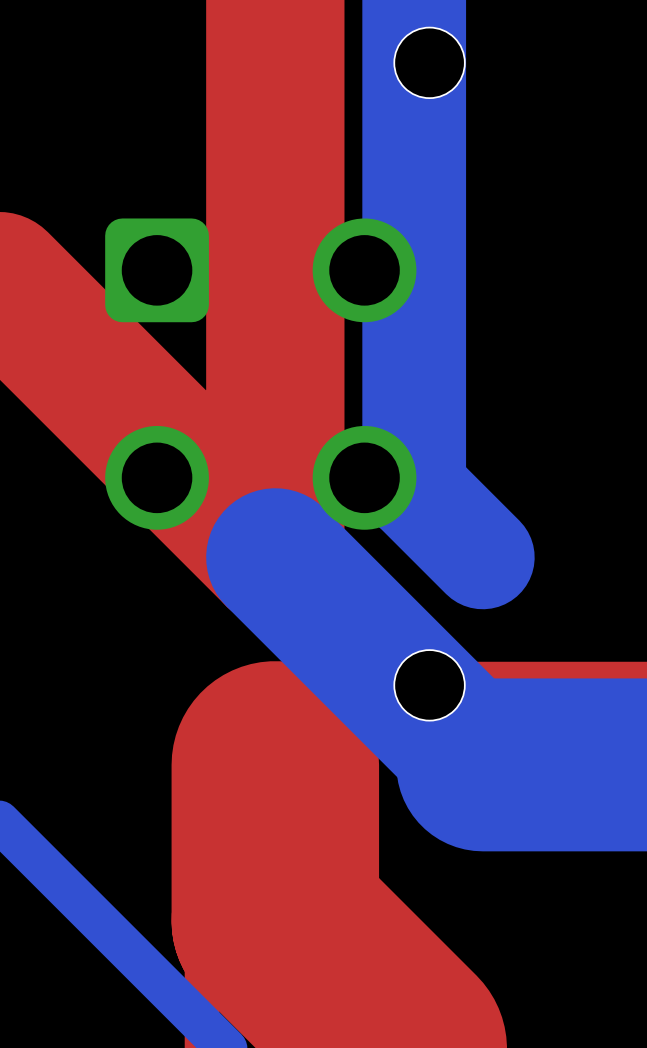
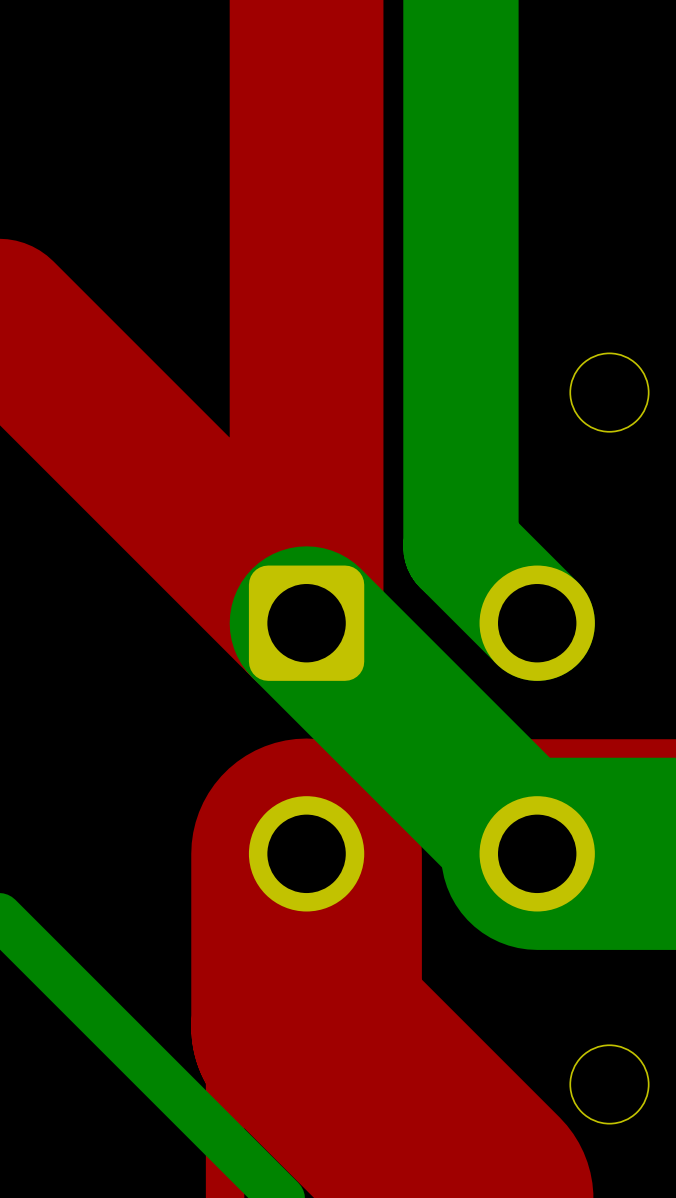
part position: (285, 374) -> (448, 738)

